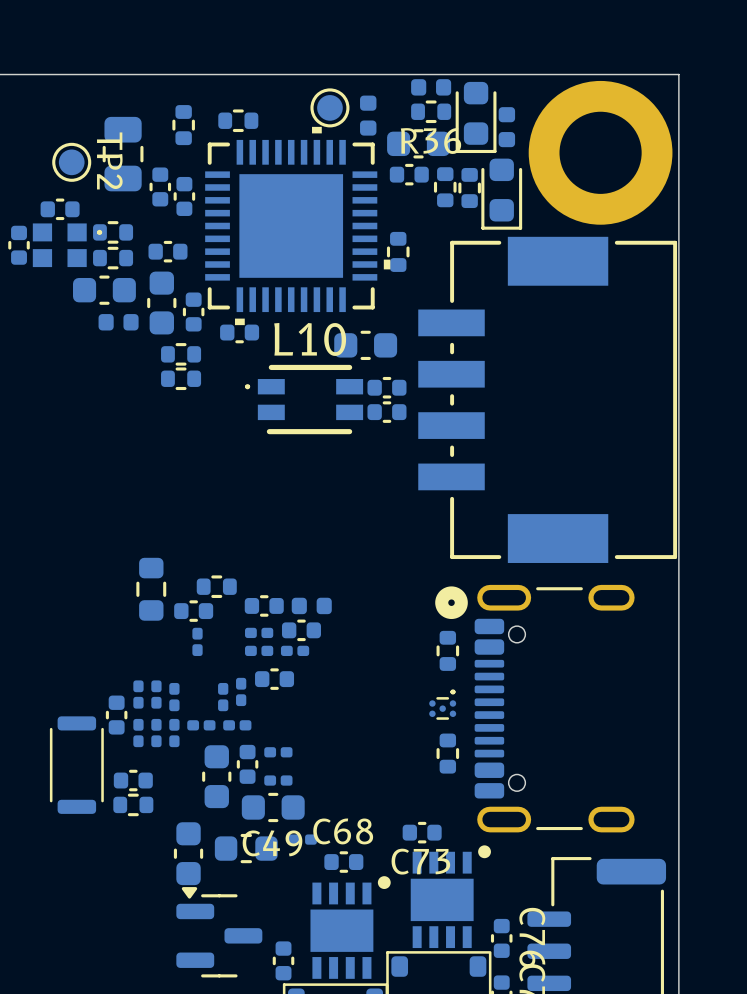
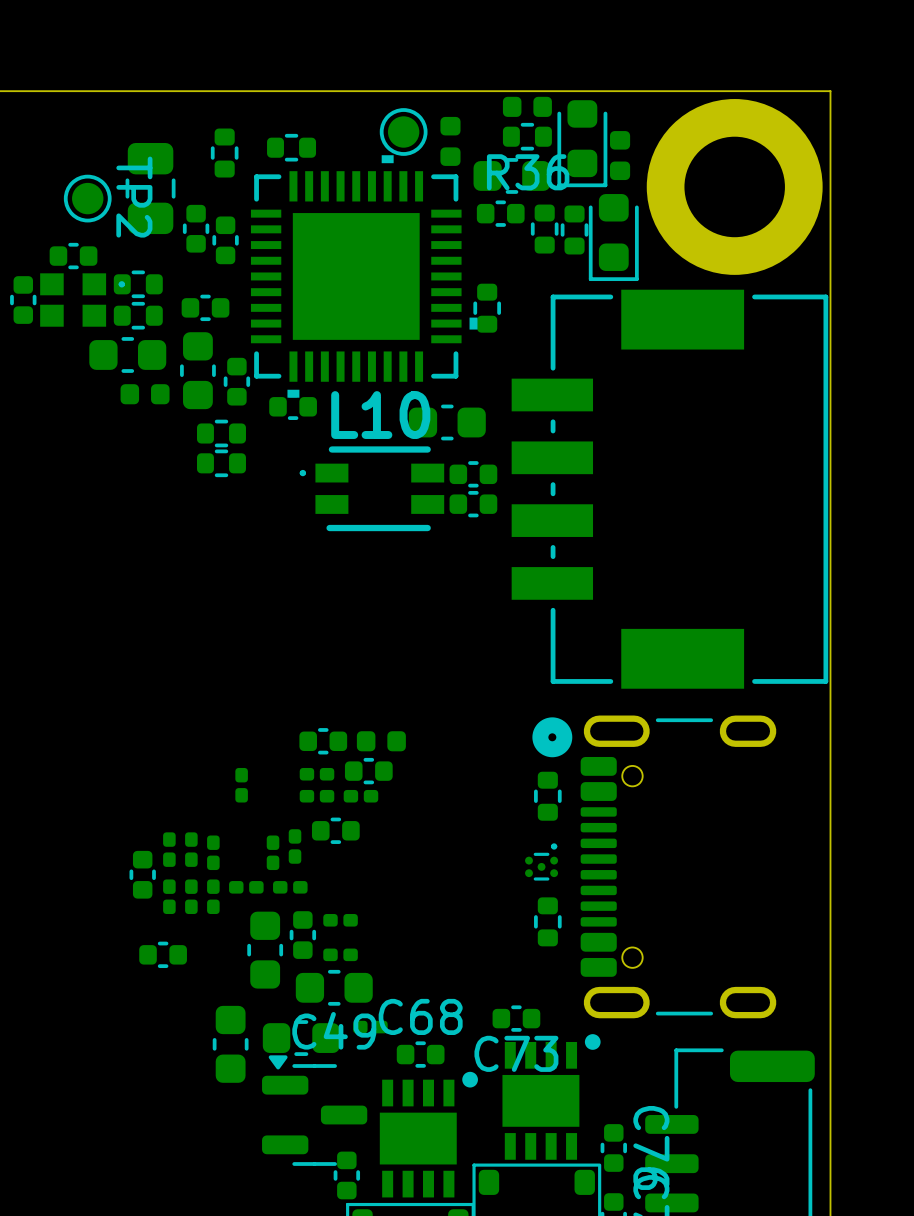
part: (216, 586) -> none
part: (151, 589) -> none
part: (193, 611) -> none
part: (76, 765) -> none
part: (133, 804) -> none
part position: (219, 932) -> (314, 1110)

